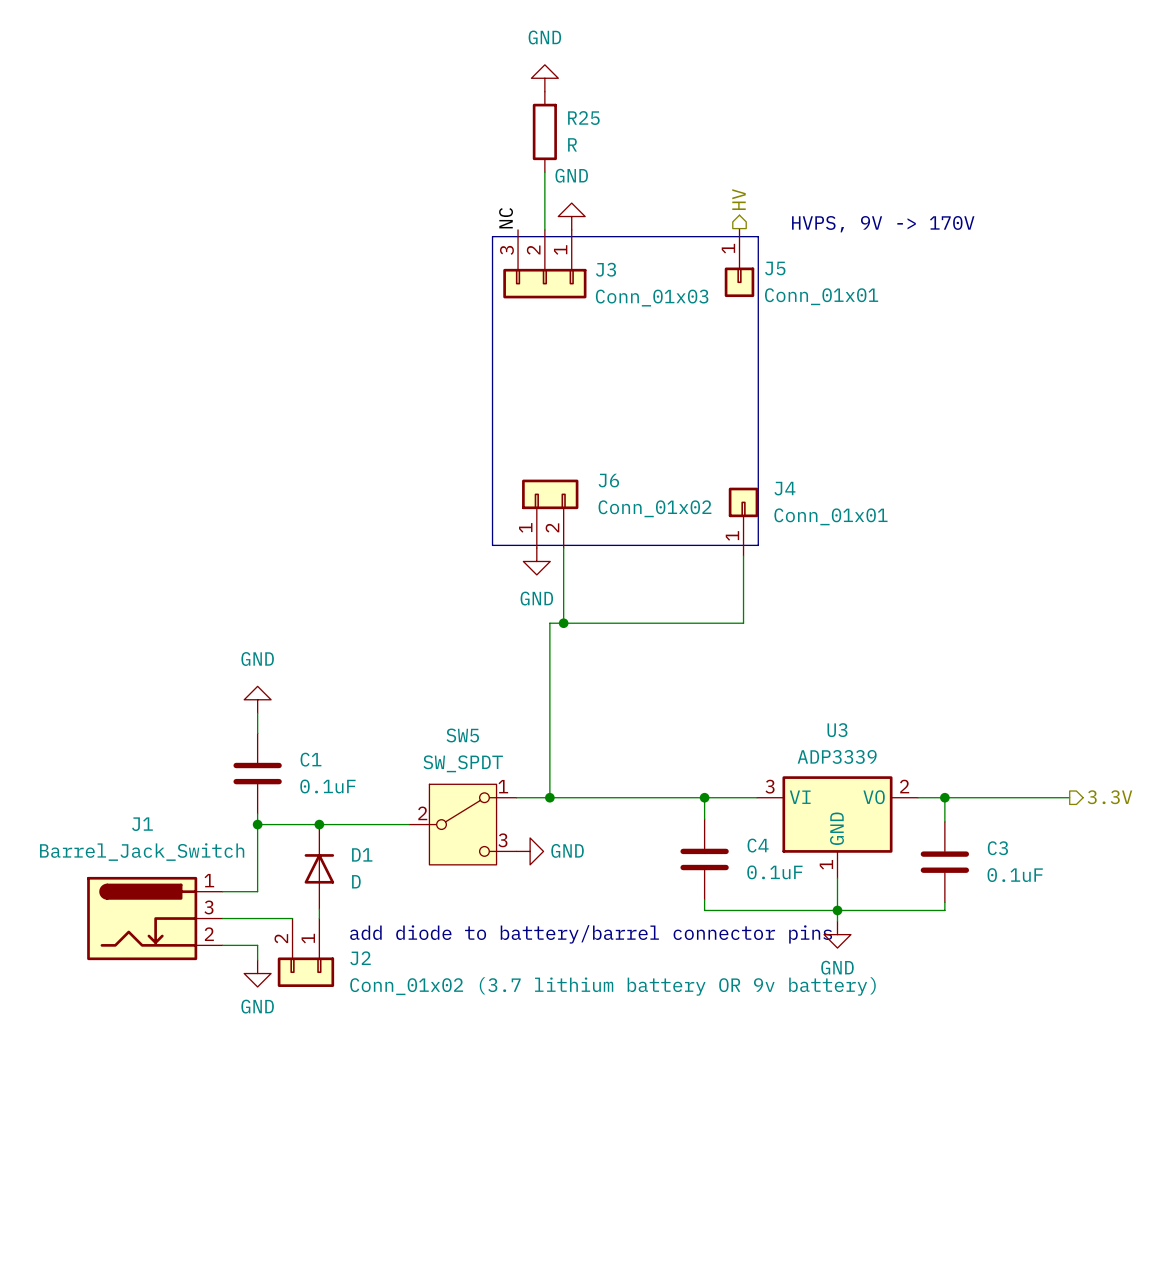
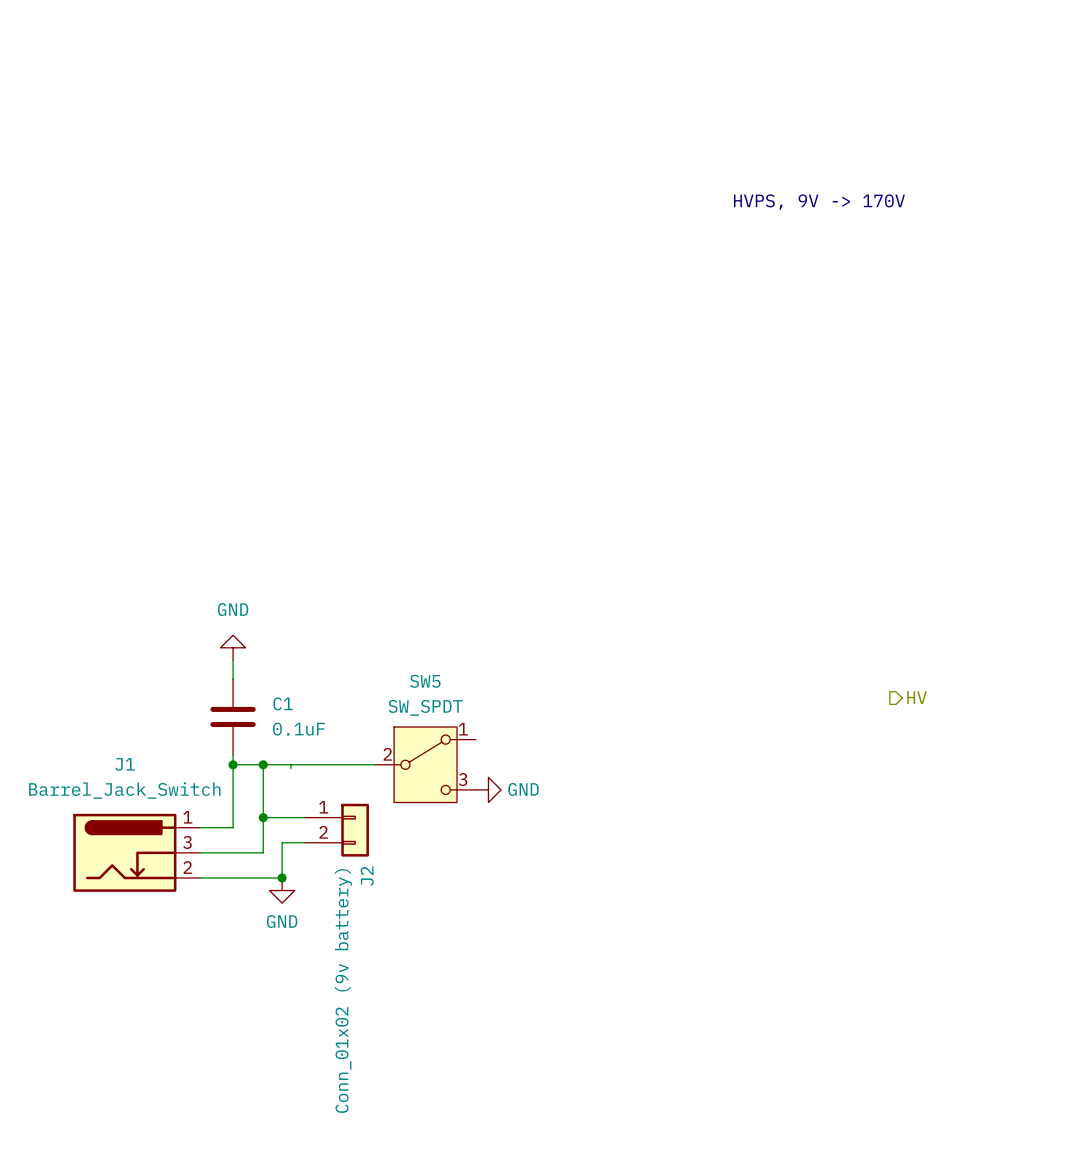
power symbol: GND (544, 78) -> none
R25: R (544, 131) -> none
wire: (544, 172) (544, 229) -> none
hierarchical label: HV (739, 199) -> none
power symbol: GND (571, 216) -> none
label: NC (506, 218) -> none
line: (492, 236) (758, 236) (758, 545) (492, 545) (492, 236) -> none
J5: Conn_01x01 (739, 262) -> none
J3: Conn_01x03 (544, 264) -> none
J6: Conn_01x02 (550, 513) -> none
J4: Conn_01x01 (743, 521) -> none
wire: (563, 548) (563, 623) -> none
wire: (743, 556) (743, 623) (549, 623) (549, 797) -> none
power symbol: GND (536, 561) -> none
junction: (563, 623) -> none
hierarchical label: none -> HV (916, 697)
wire: (516, 797) (756, 797) -> none
junction: (549, 797) -> none
wire: (704, 797) (704, 819) -> none
junction: (704, 797) -> none
wire: (918, 797) (1069, 797) -> none
wire: (944, 797) (944, 821) -> none
junction: (944, 797) -> none
hierarchical label: 3.3V (1109, 797) -> none
junction position: (319, 824) -> (263, 764)
U3: ADP3339 (837, 827) -> none
C4: 0.1uF (704, 859) -> none
C3: 0.1uF (944, 862) -> none
D1: D (319, 868) -> none
wire: (837, 878) (837, 921) -> none
wire: none -> (263, 817) (304, 817)
junction: none -> (263, 817)
wire: (704, 899) (704, 910) (944, 910) (944, 902) -> none
wire: (319, 909) (319, 918) -> none
junction: (837, 910) -> none
wire: (289, 918) (292, 918) -> (263, 852) (263, 764)
text: add diode to battery/barrel connector pins (591, 934) -> none
power symbol: GND (837, 934) -> none
wire: (257, 945) (257, 960) -> (233, 878) (282, 878) (282, 842) (304, 842)
junction: none -> (282, 877)
J2 position: (305, 952) -> (336, 830)
J2 name position: J2 (360, 958) -> J2 (367, 876)
J2 rotation: 0° (305, 972) -> 90° counterclockwise (355, 830)
power symbol position: GND (257, 973) -> GND (282, 890)
J2 value: Conn_01x02 (3.7 lithium battery OR 9v battery) (612, 986) -> Conn_01x02 (9v battery) (343, 991)

